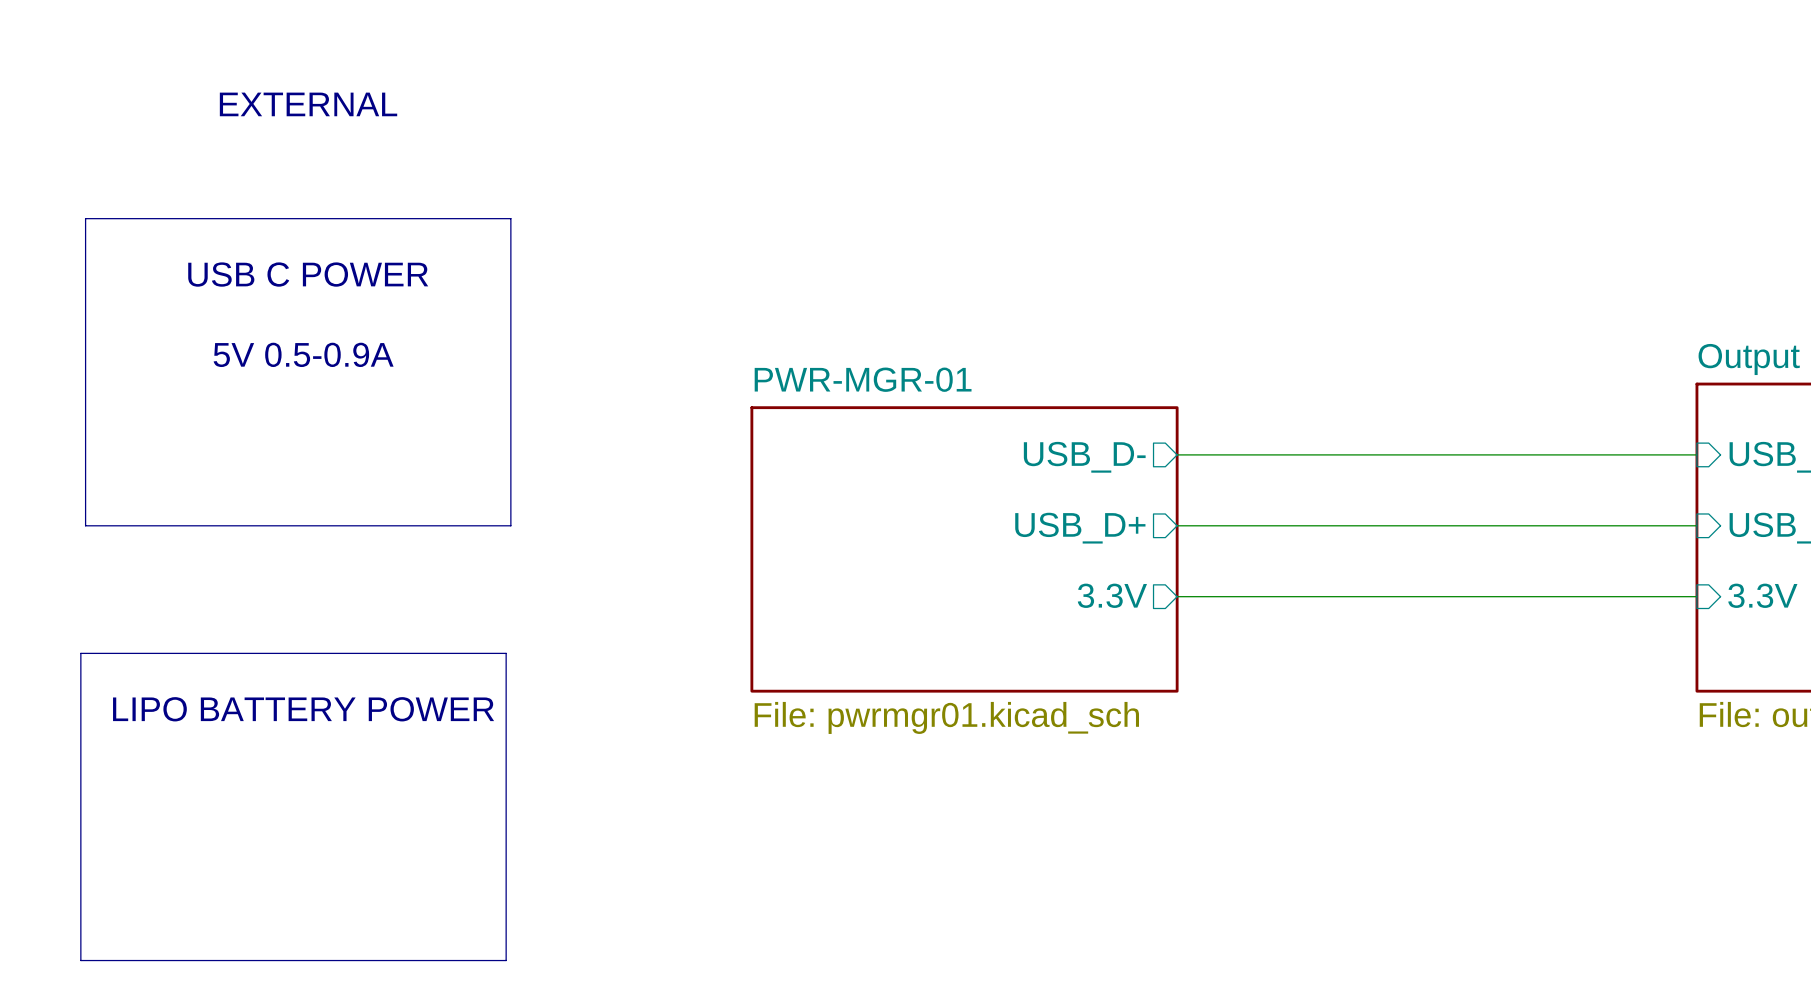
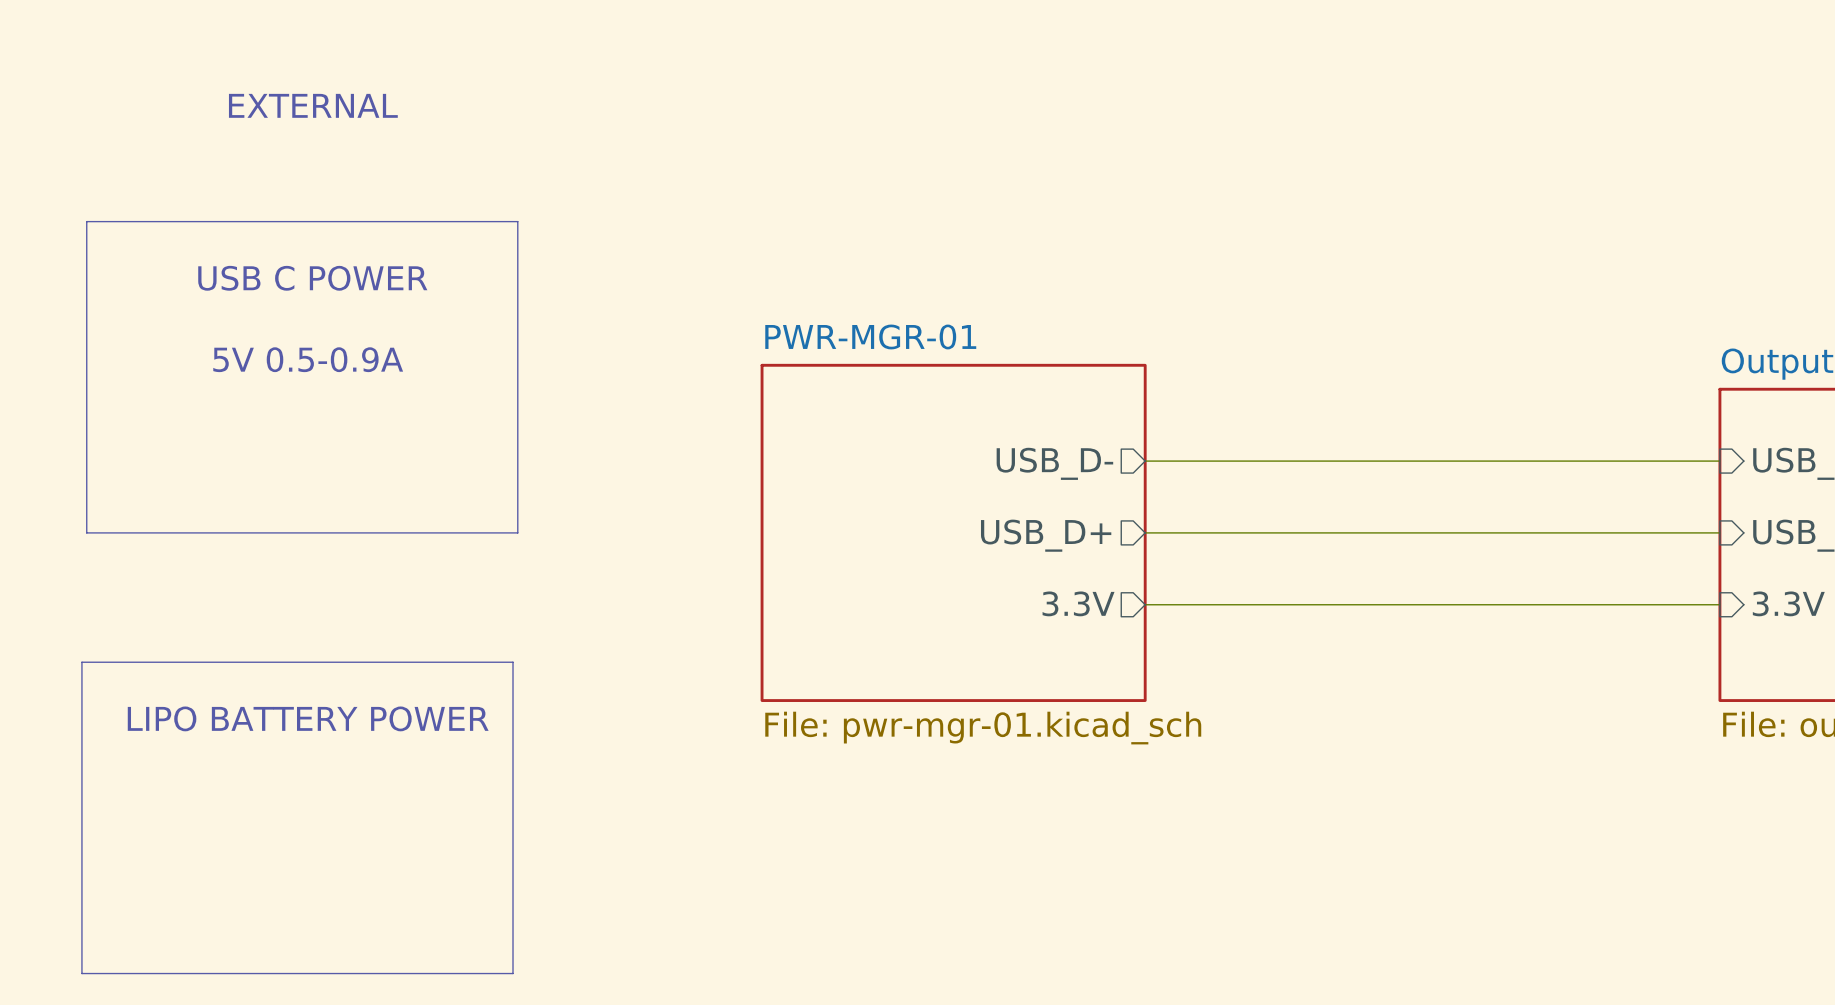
sheet PWR-MGR-01 shape: [750, 406, 1179, 693] -> [760, 363, 1147, 702]
wire: none -> (1145, 461) (1193, 461)
sheet pin position: USB_D- (1084, 457) -> USB_D- (1054, 463)
wire: none -> (1145, 532) (1193, 532)
sheet pin position: USB_D+ (1080, 528) -> USB_D+ (1046, 535)
sheet pin position: 3.3V (1112, 595) -> 3.3V (1078, 603)
wire: none -> (1145, 604) (1193, 604)
sheet PWR-MGR-01 value: File: pwrmgr01.kicad_sch (946, 717) -> File: pwr-mgr-01.kicad_sch (983, 728)

